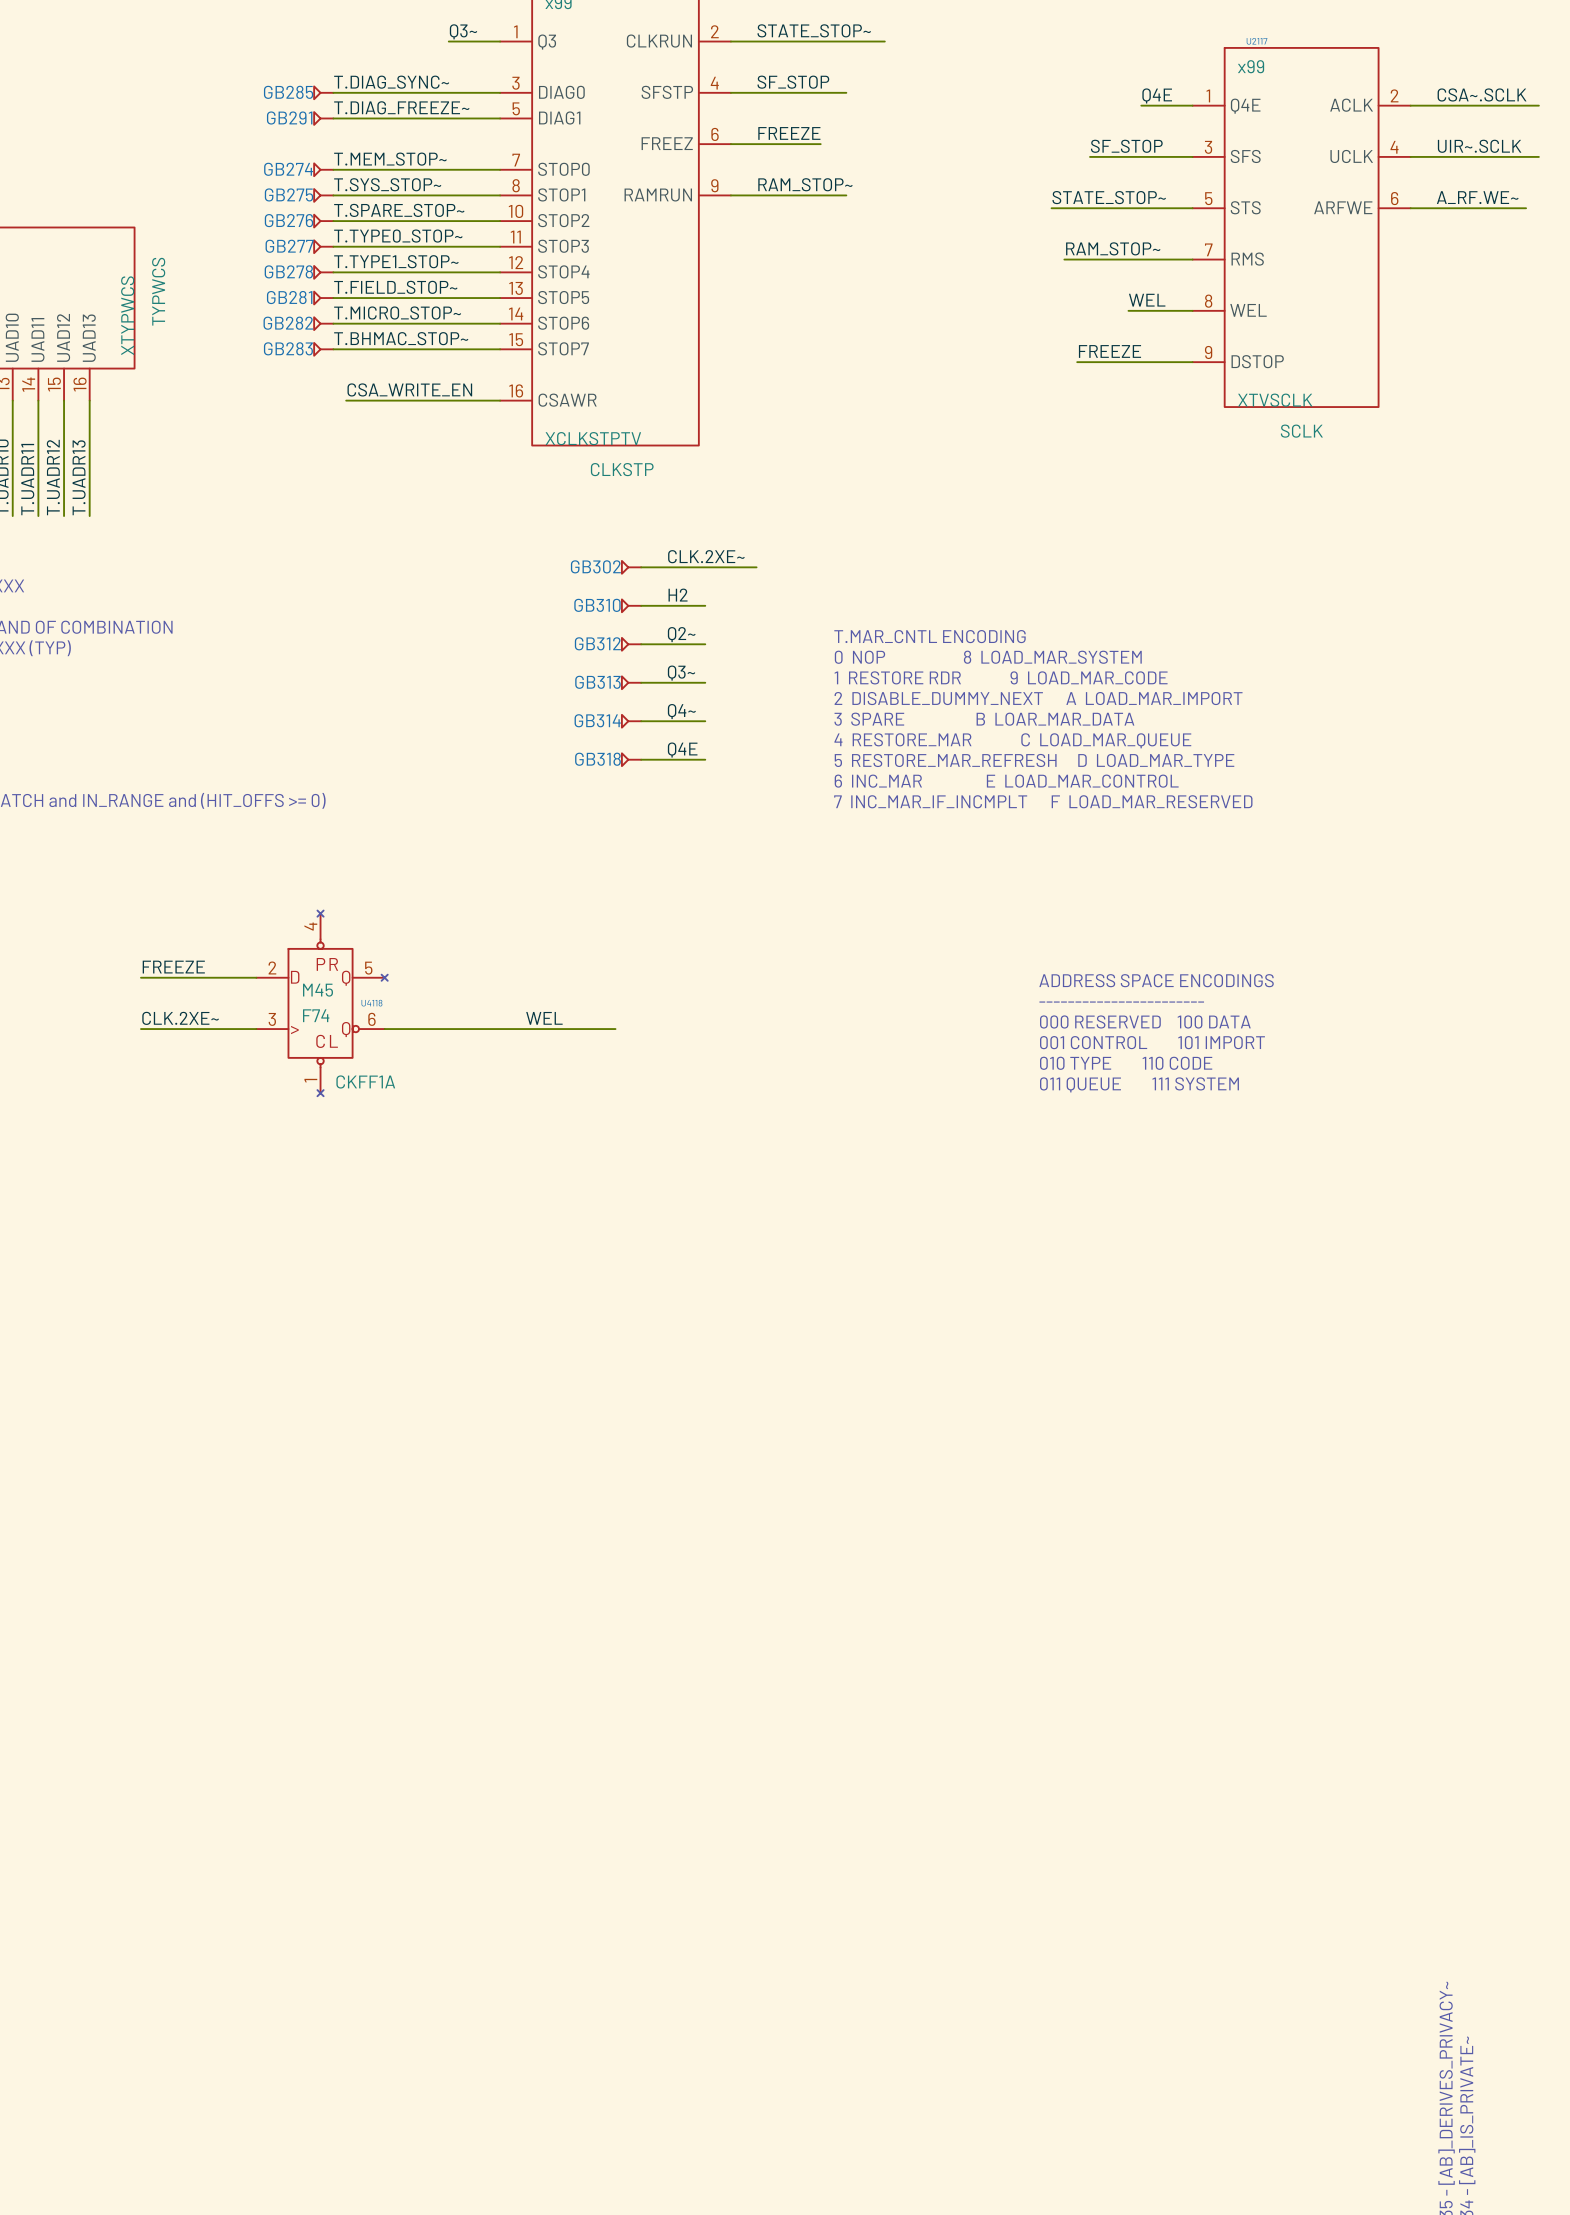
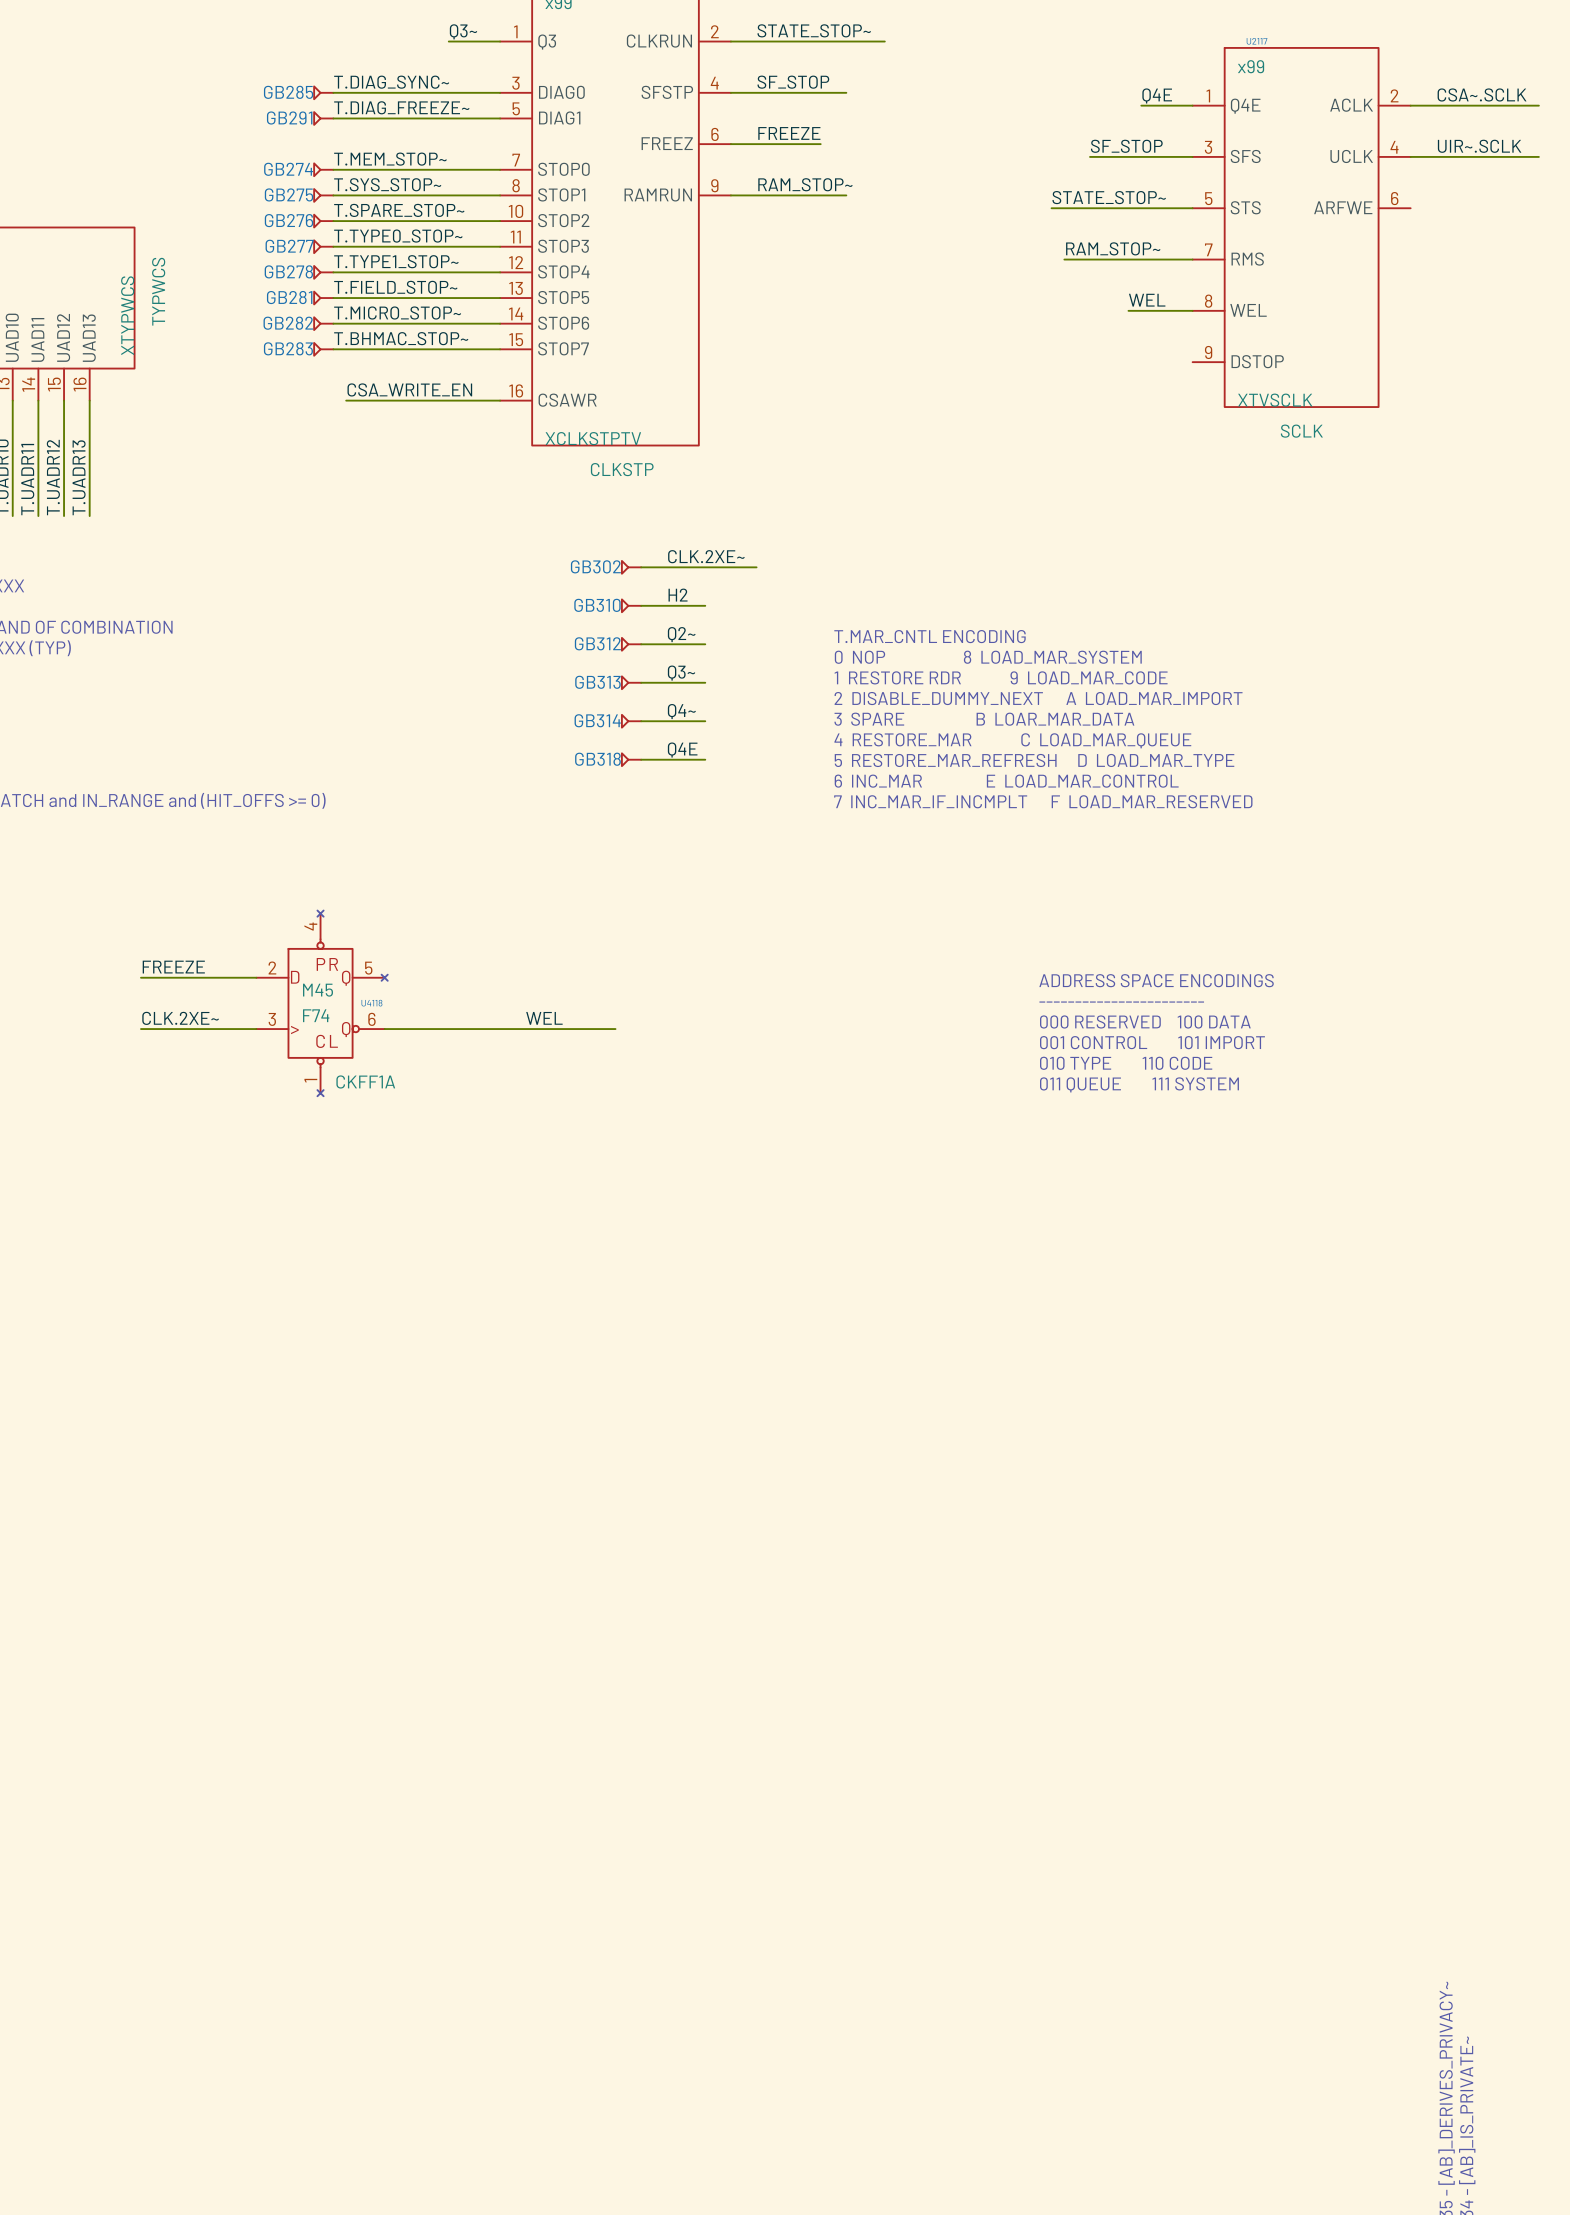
label: A_RF.WE~ (1477, 197) -> none
wire: (1410, 208) (1526, 208) -> none
label: FREEZE (1109, 351) -> none
wire: (1077, 362) (1192, 362) -> none

